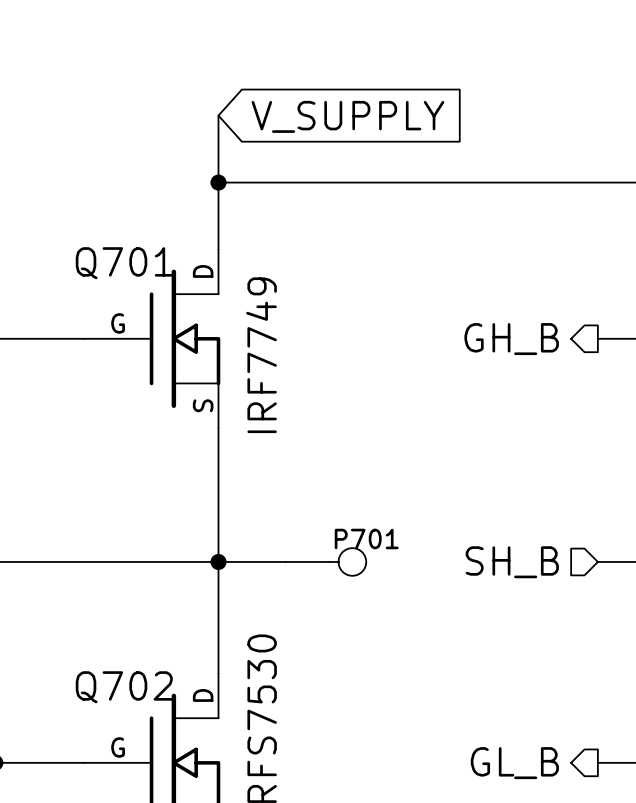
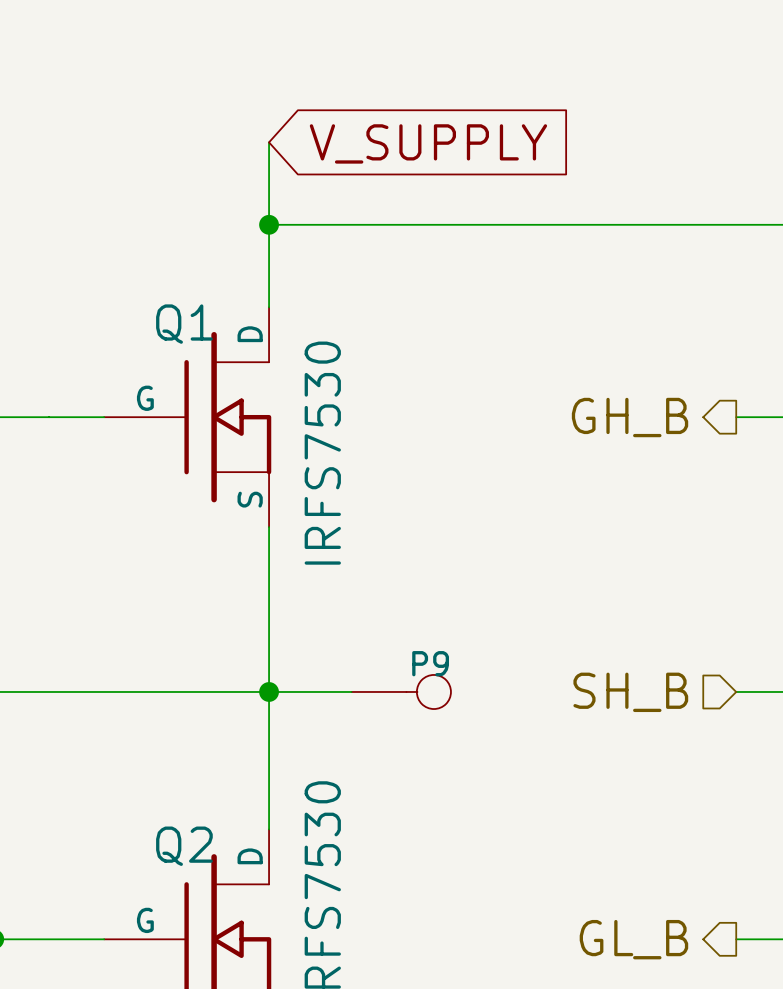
Q701 name: Q701 (124, 263) -> Q1 (184, 324)
Q701 value: IRF7749 (261, 355) -> IRFS7530 (322, 453)
P701 name: P701 (366, 538) -> P9 (430, 663)
Q702 name: Q702 (124, 687) -> Q2 (184, 846)

